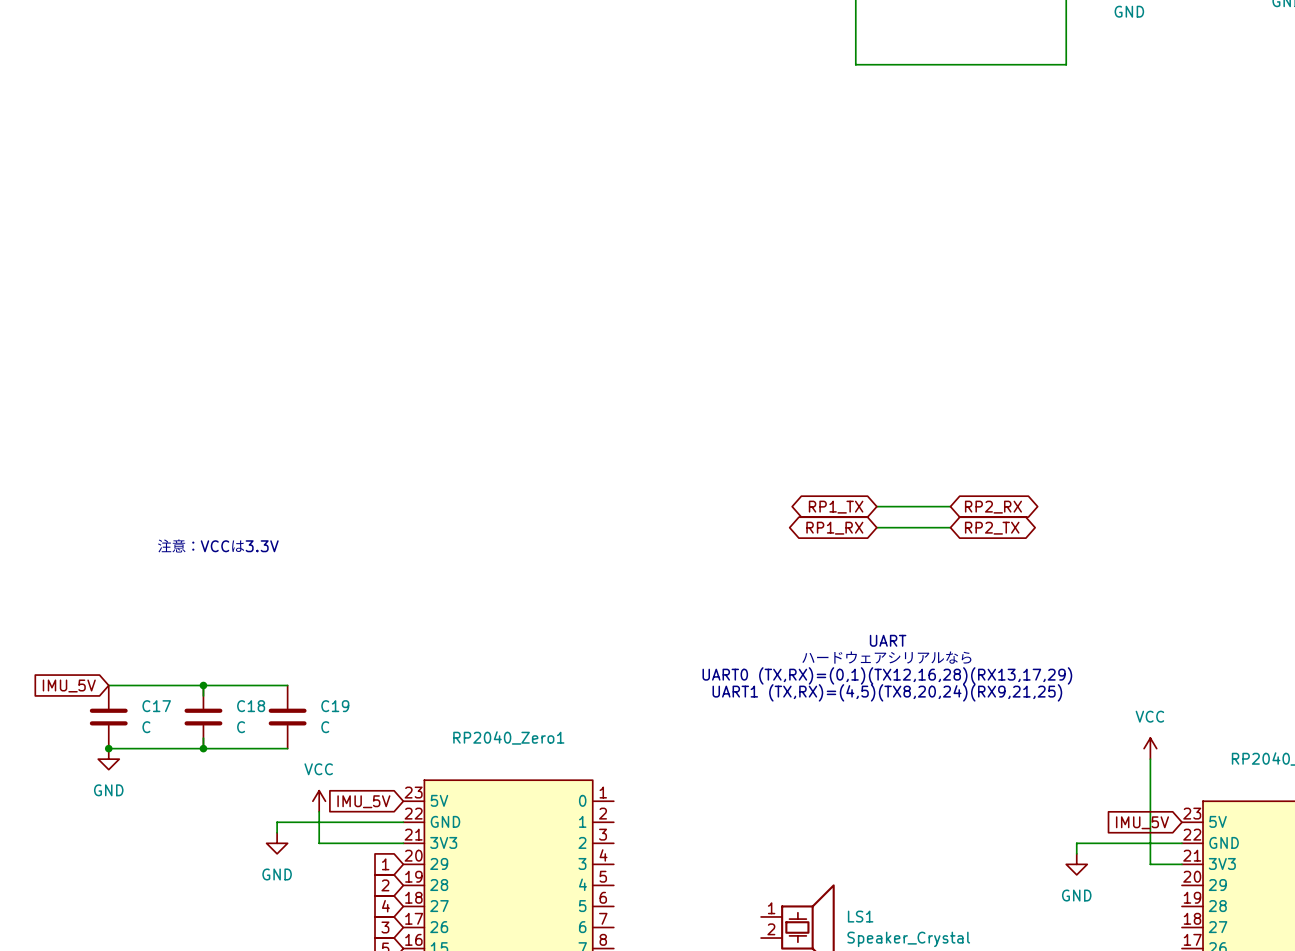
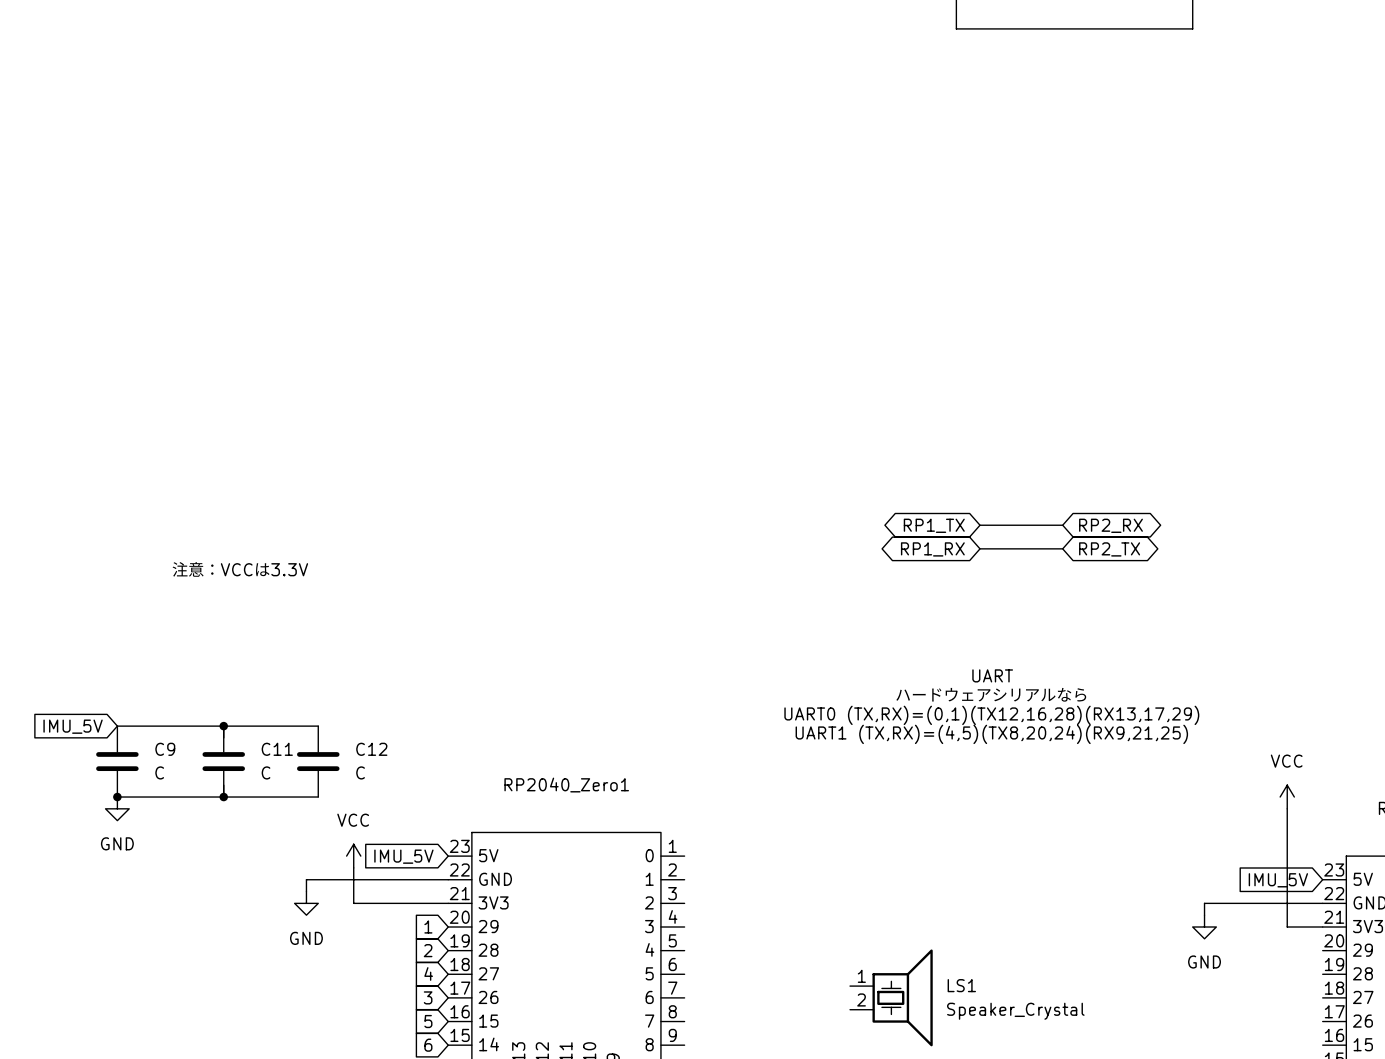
C17 name: C17 (156, 706) -> C9 (165, 749)
C18 name: C18 (251, 706) -> C11 (277, 749)
C19 name: C19 (335, 706) -> C12 (371, 749)

